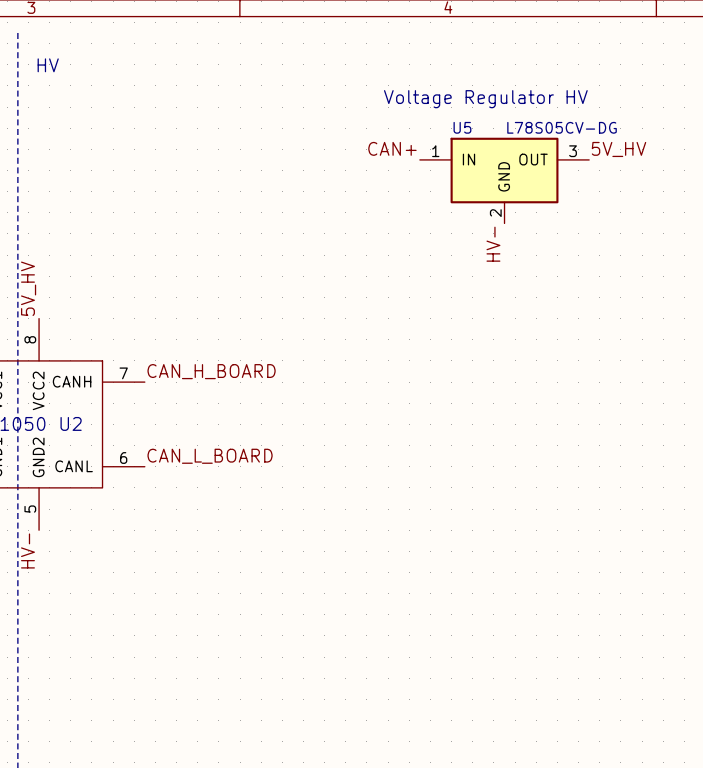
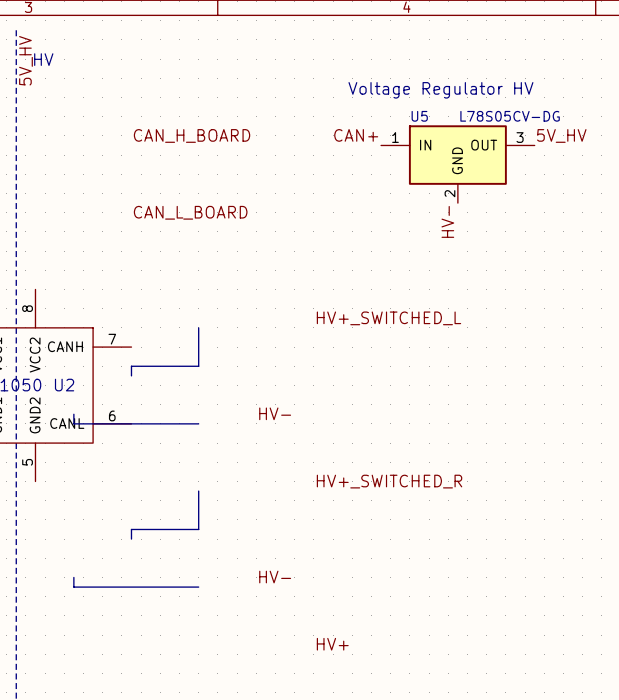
label: none -> 5V_HV (25, 60)
label: none -> CAN_H_BOARD (192, 135)
label: none -> CAN_L_BOARD (190, 212)
label: 5V_HV (28, 288) -> none
label: none -> HV+_SWITCHED_L (388, 318)
wire: none -> (198, 327) (198, 366) (131, 366) (131, 375)
label: CAN_H_BOARD (211, 371) -> none
label: none -> HV- (275, 413)
wire: none -> (73, 414) (73, 423) (198, 423)
label: CAN_L_BOARD (210, 456) -> none
label: none -> HV+_SWITCHED_R (389, 481)
wire: none -> (198, 491) (198, 529) (131, 529) (131, 539)
label: HV- (27, 550) -> none
wire: none -> (73, 577) (73, 587) (198, 587)
label: none -> HV- (275, 577)
label: none -> HV+ (332, 644)

